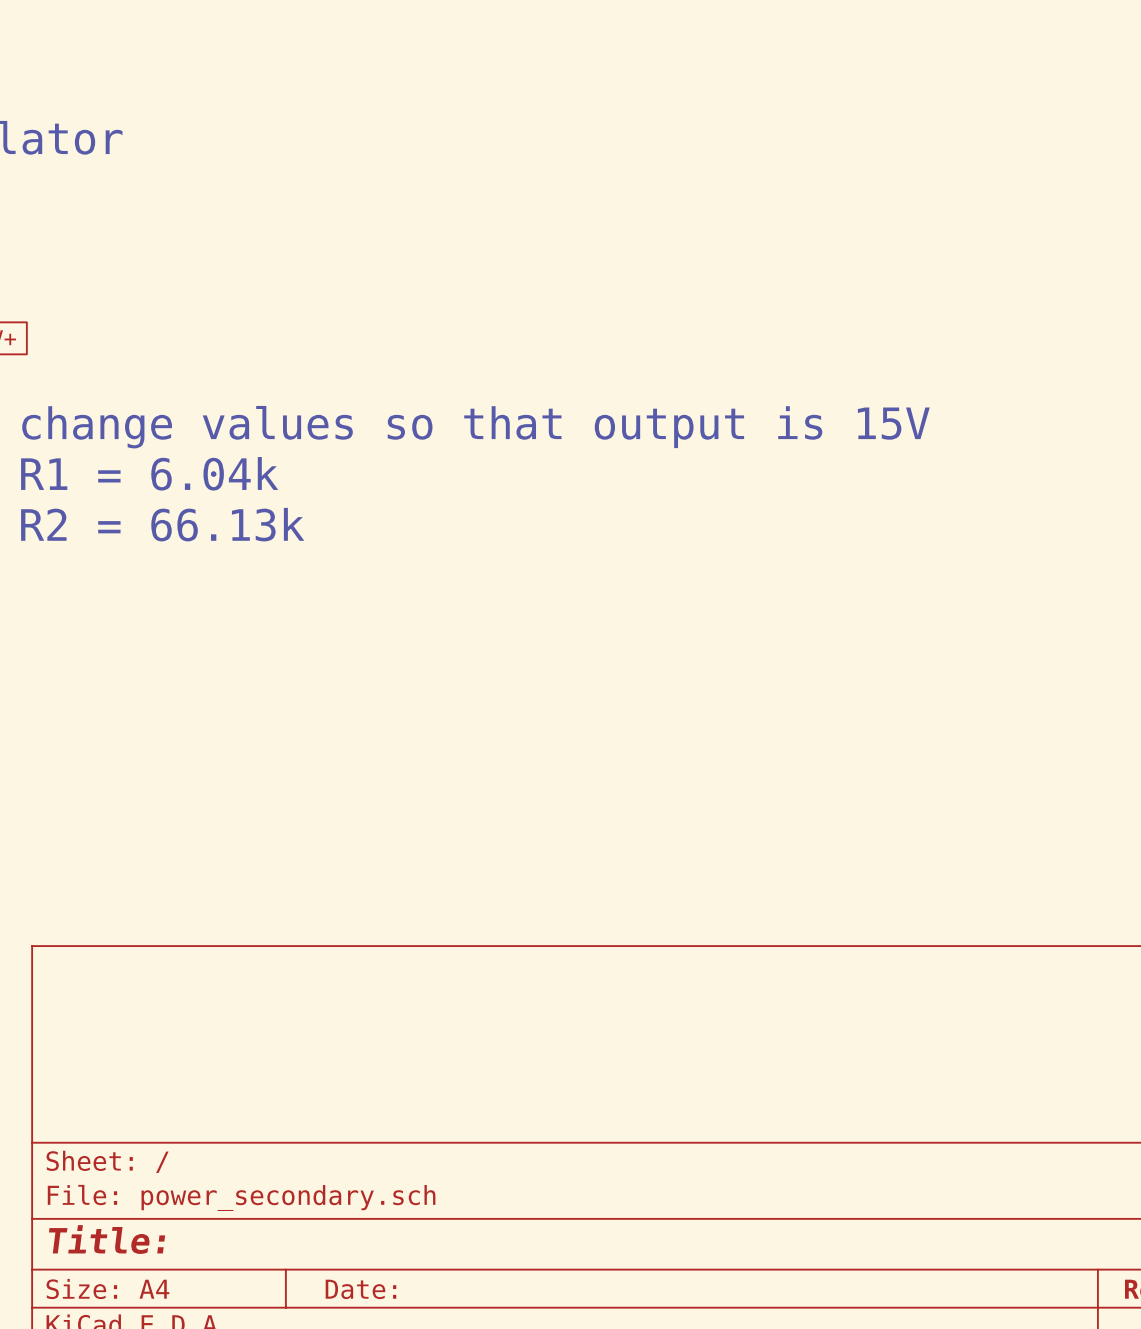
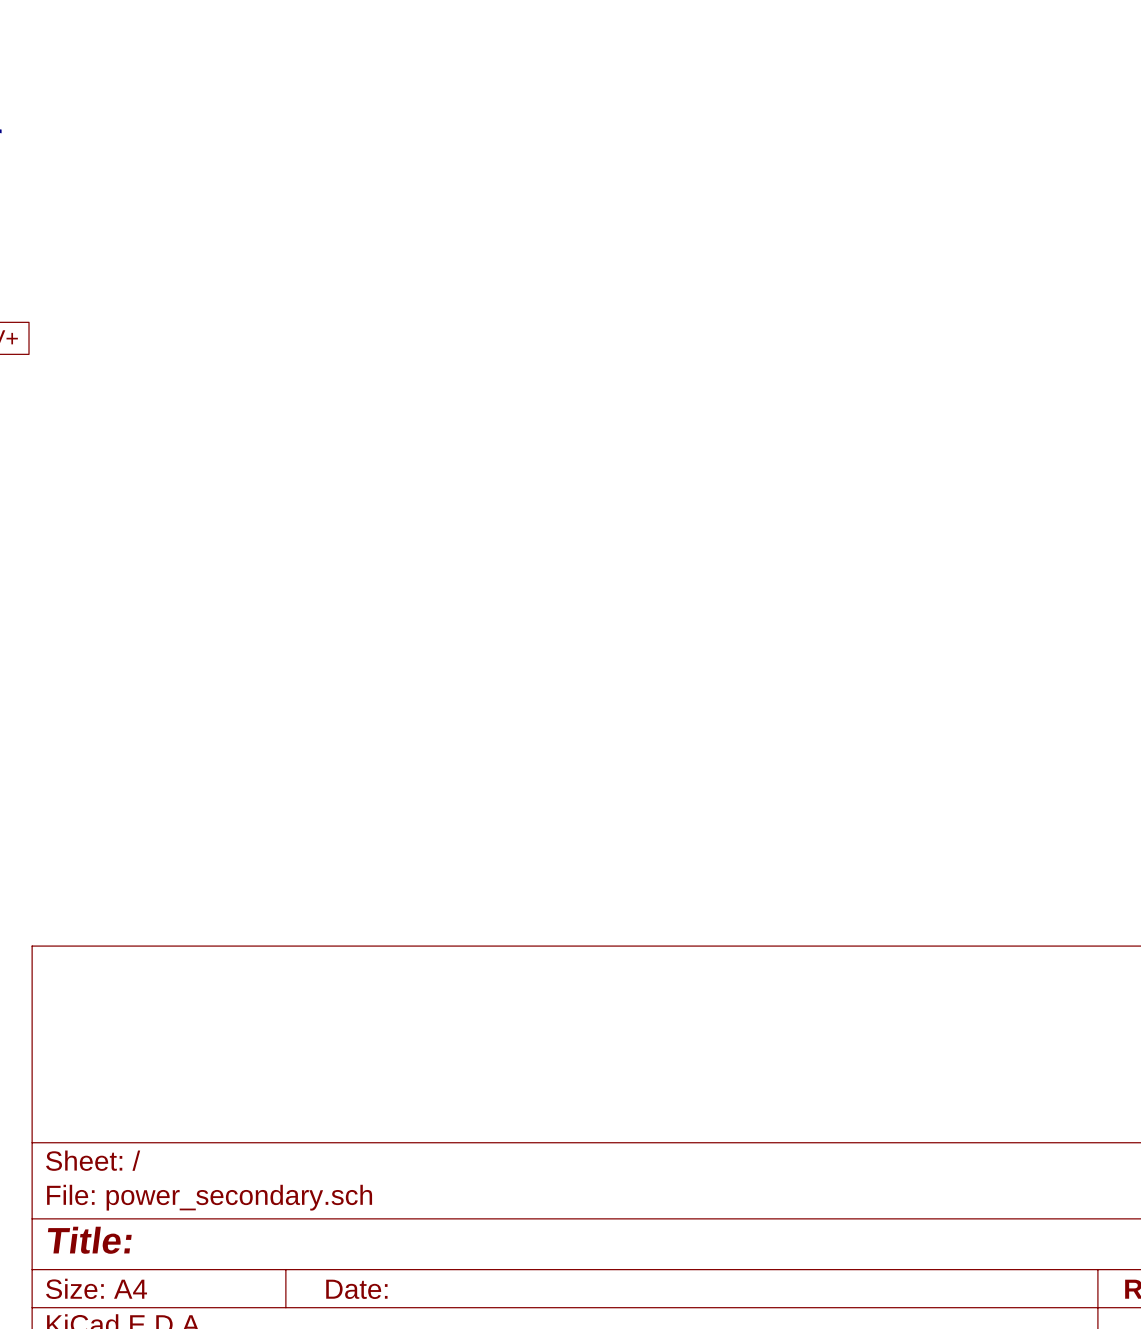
text: change values so that output is 15V (475, 427) -> none
text: R1 = 6.04k (149, 473) -> none
text: R2 = 66.13k (162, 524) -> none

